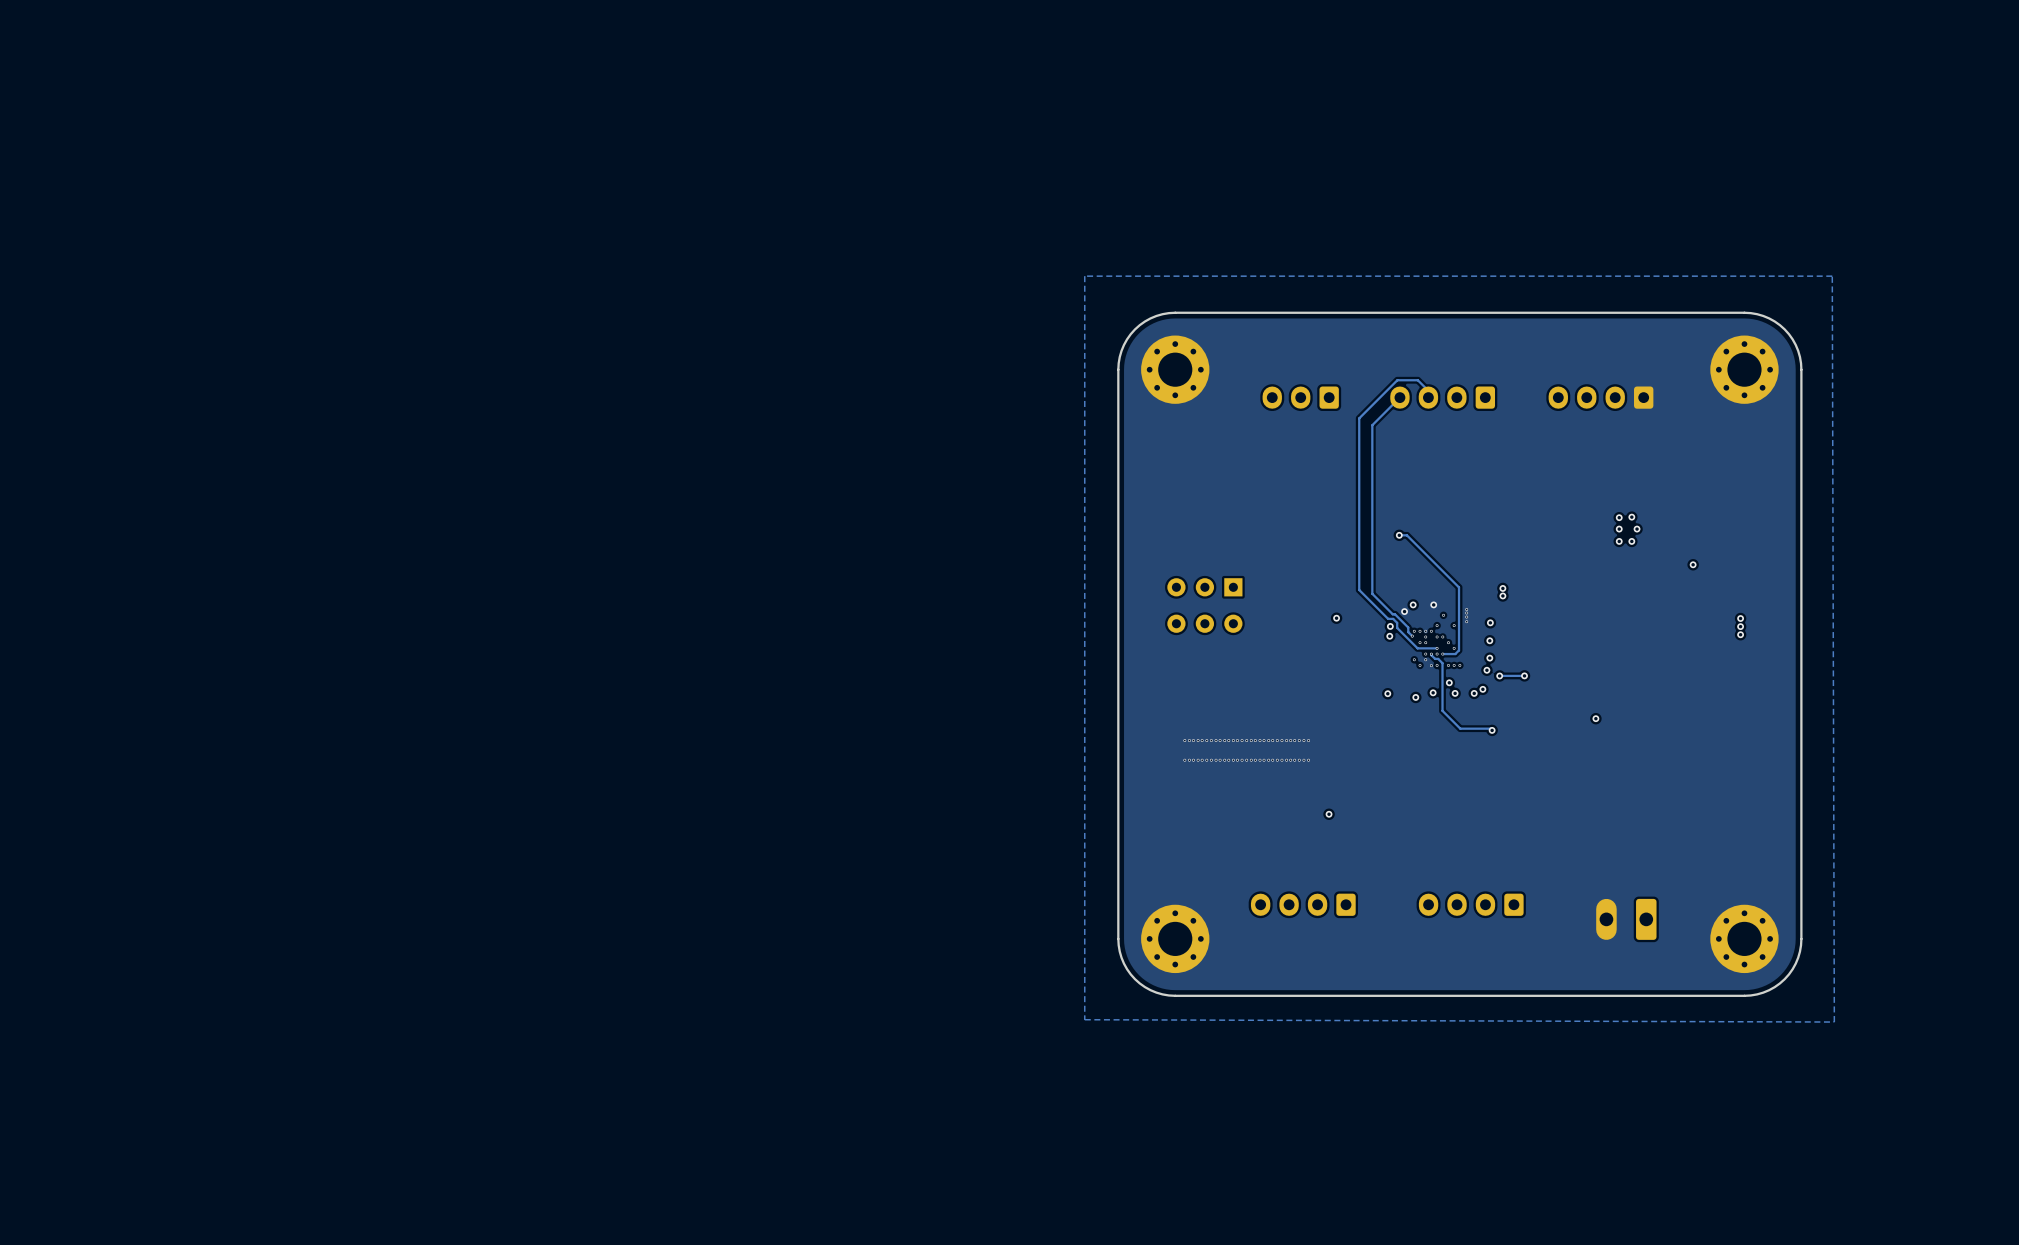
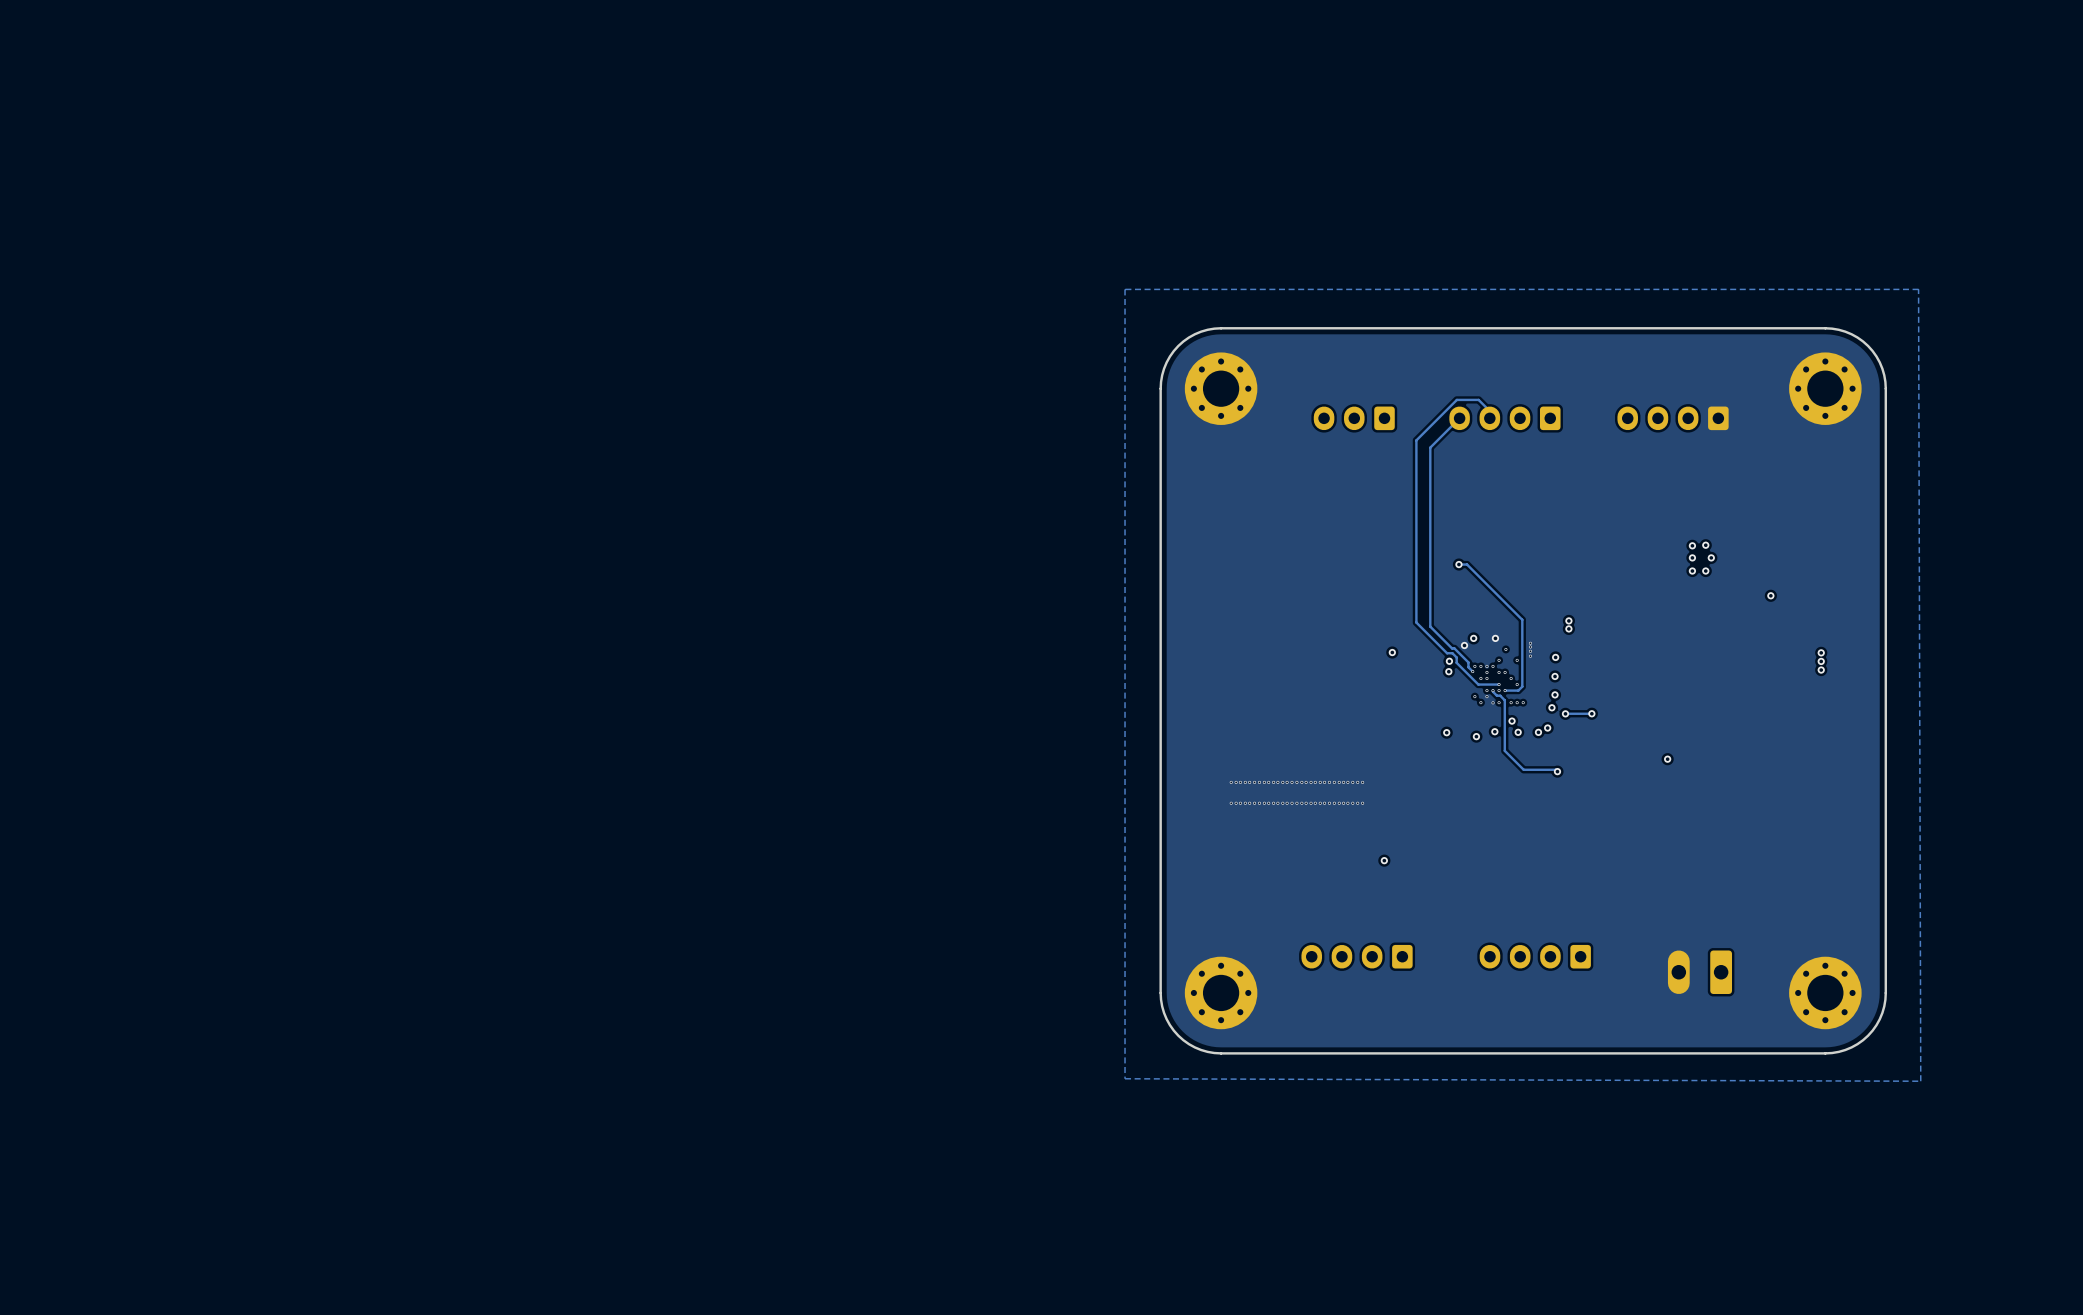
part: (1204, 605) -> none

